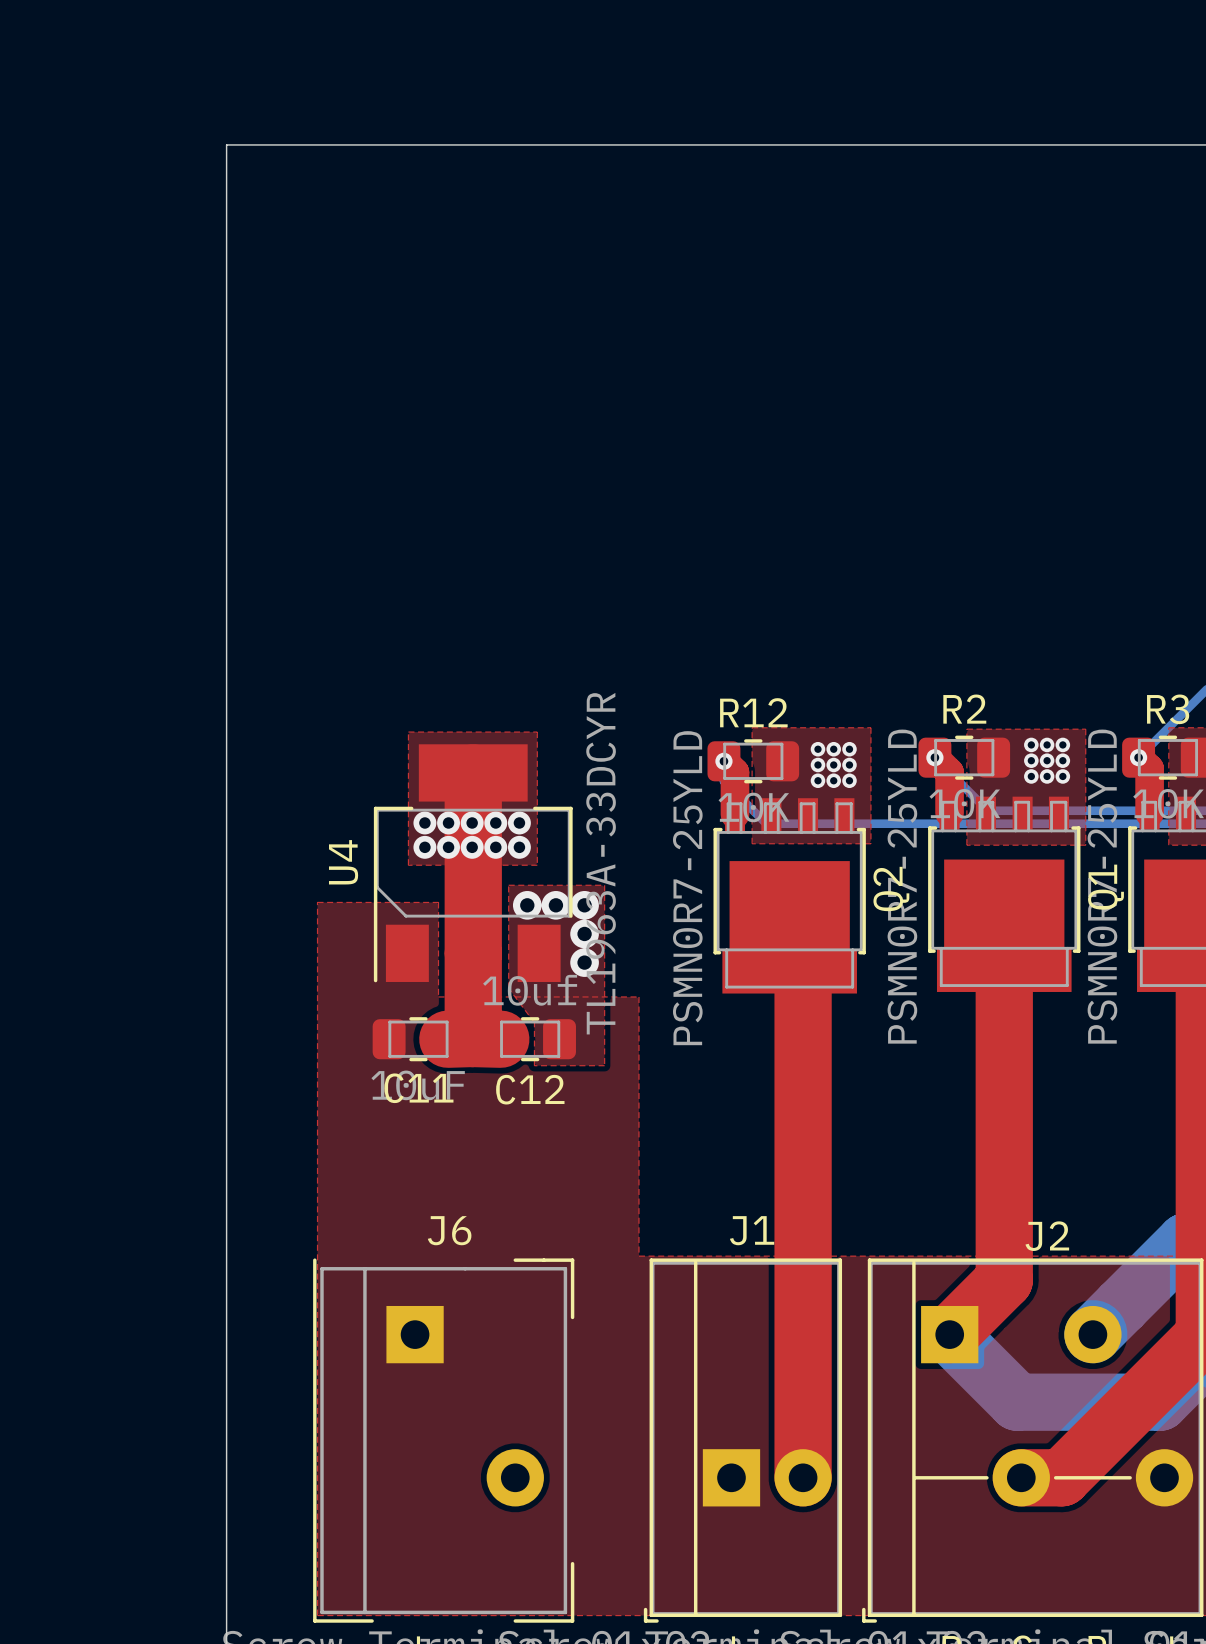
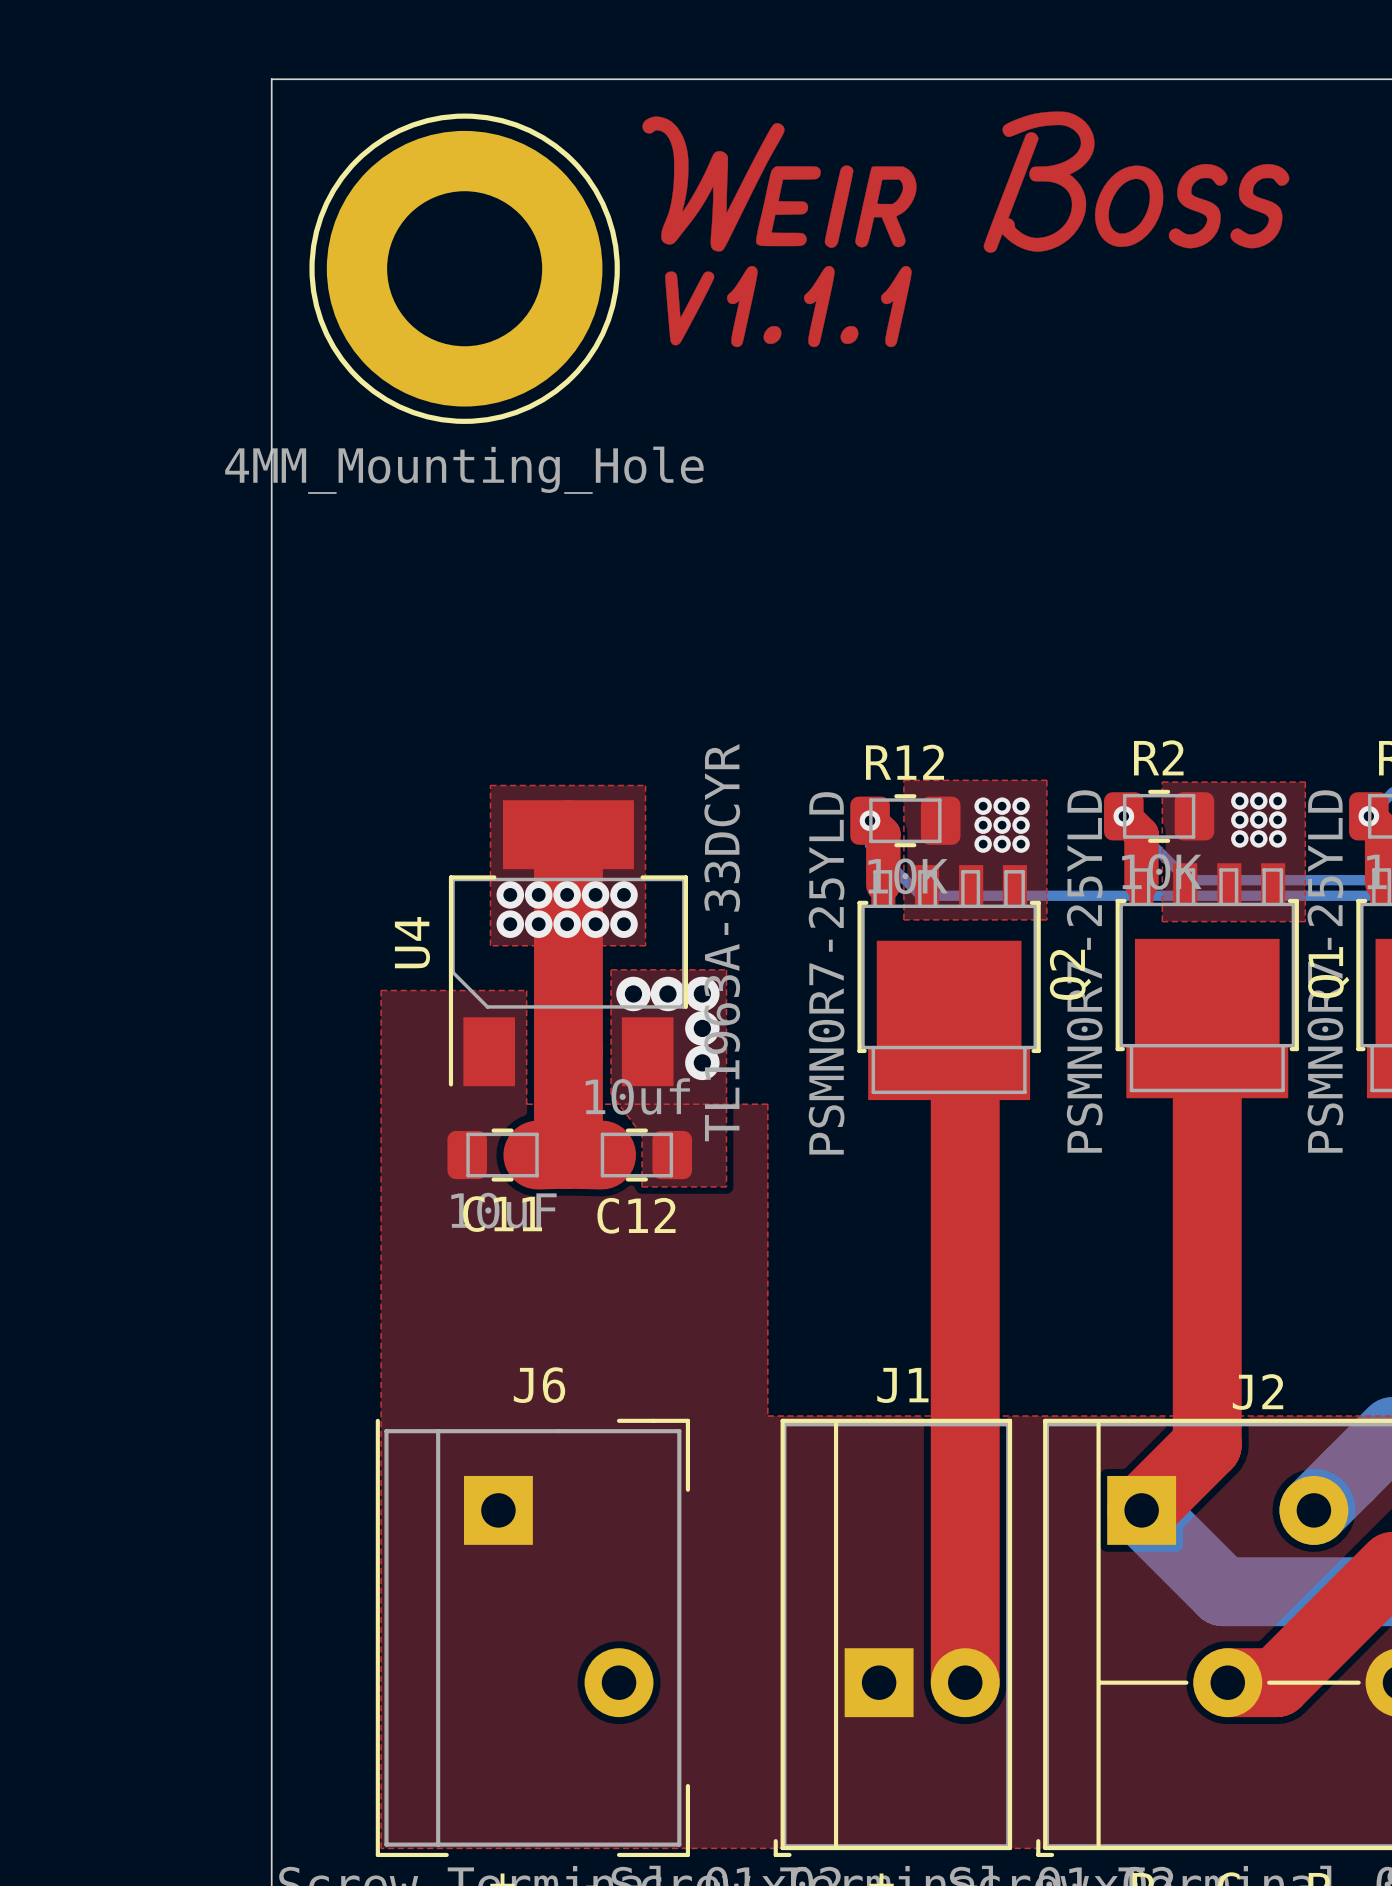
drawing: none -> [642, 111, 1290, 348]
part: none -> 4MM_Mounting_Hole (464, 268)

